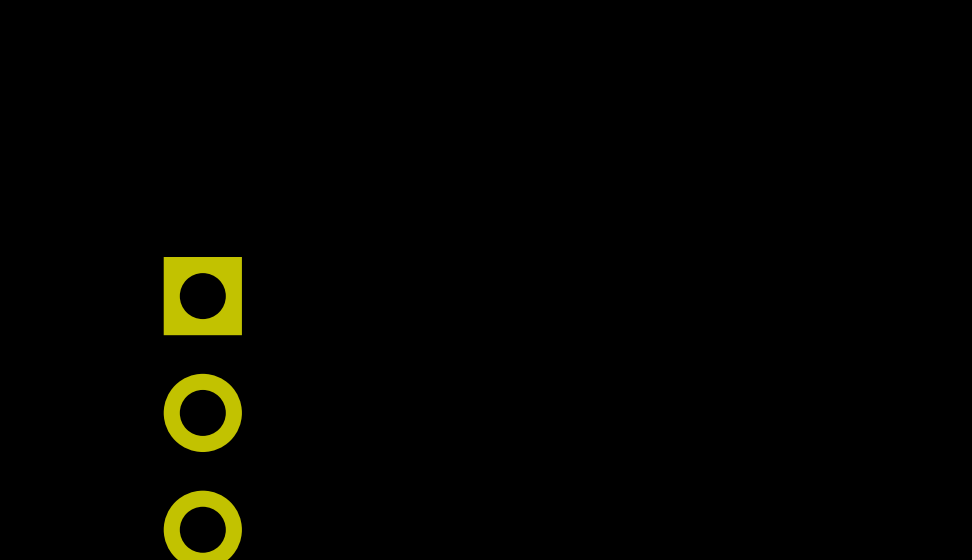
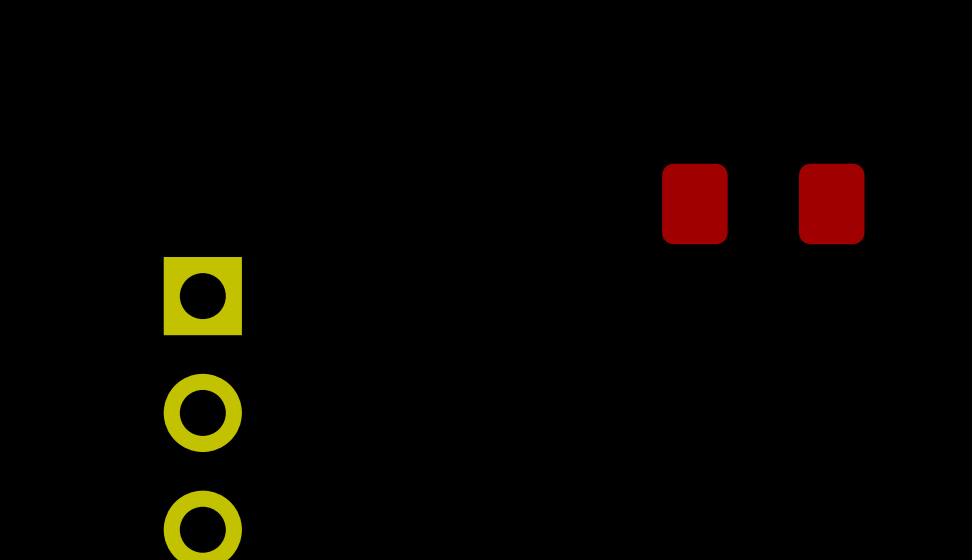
part: none -> (763, 203)

